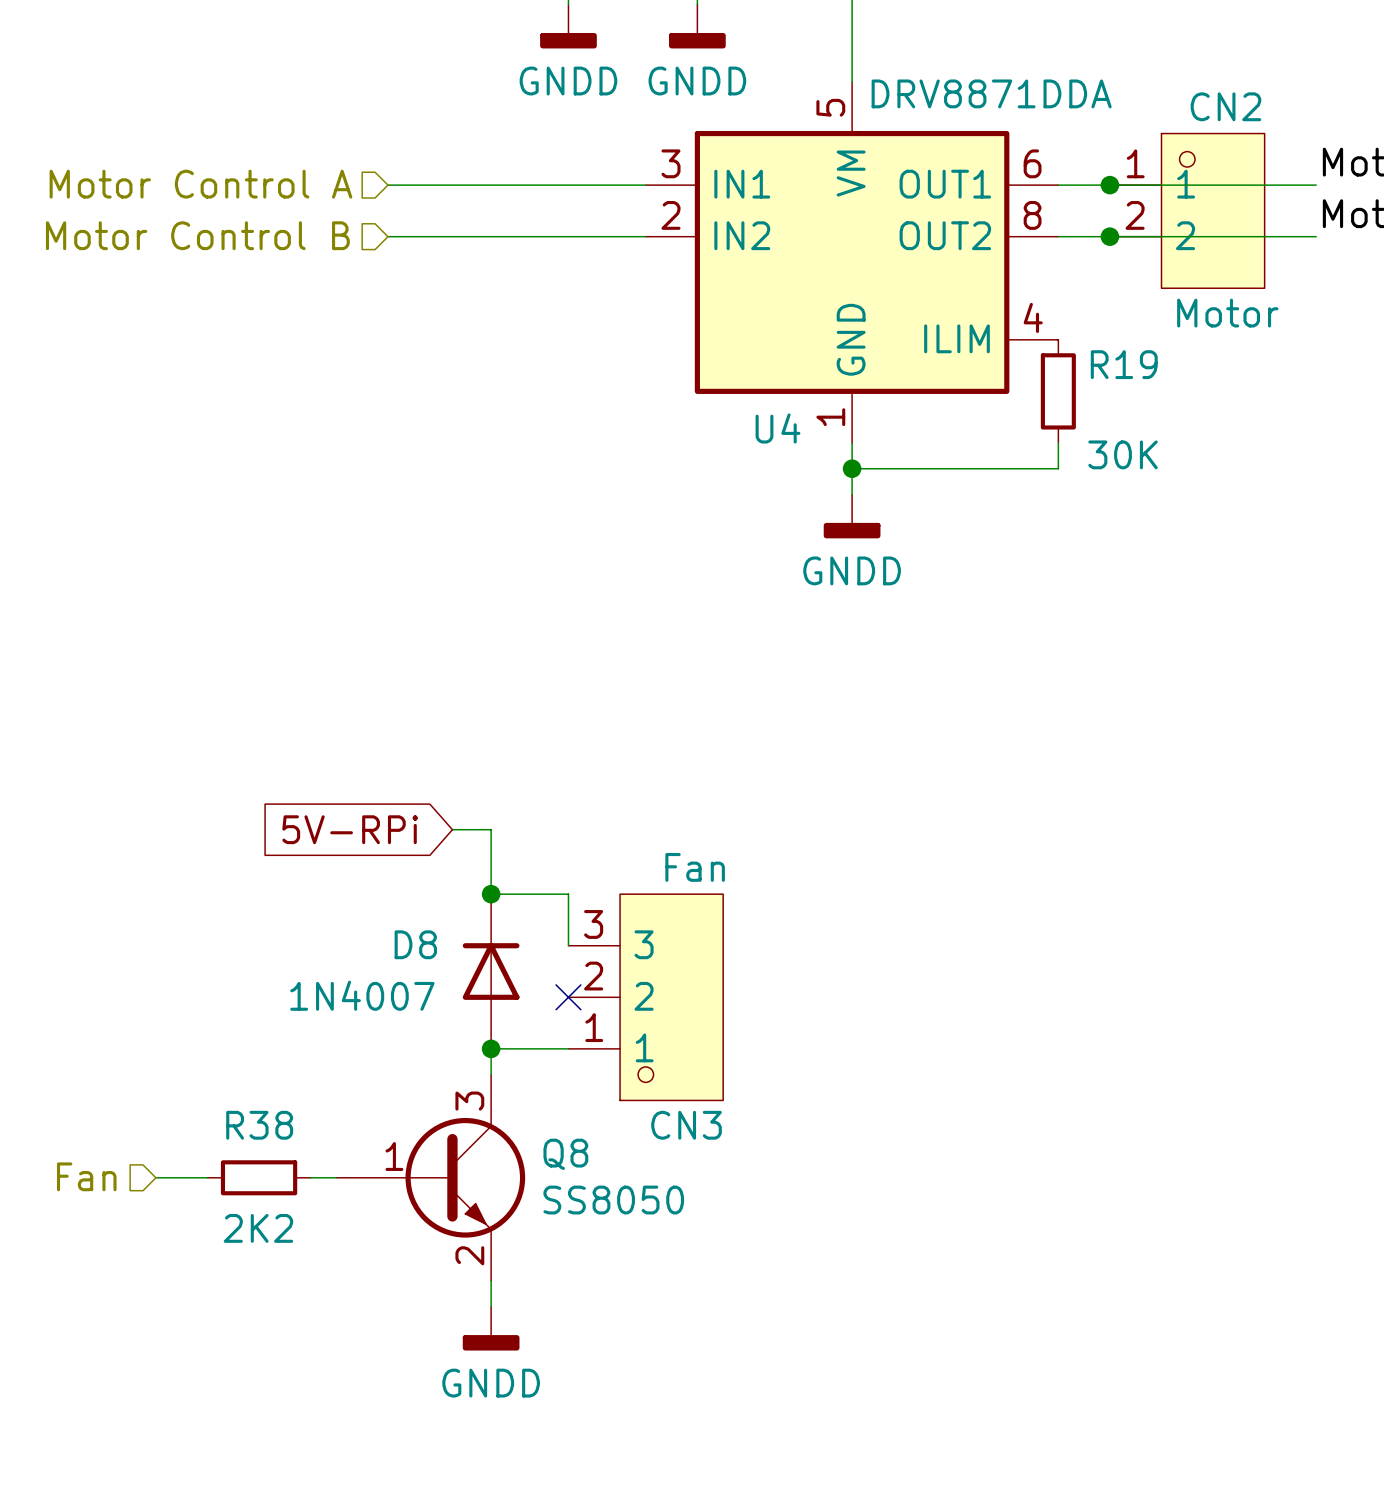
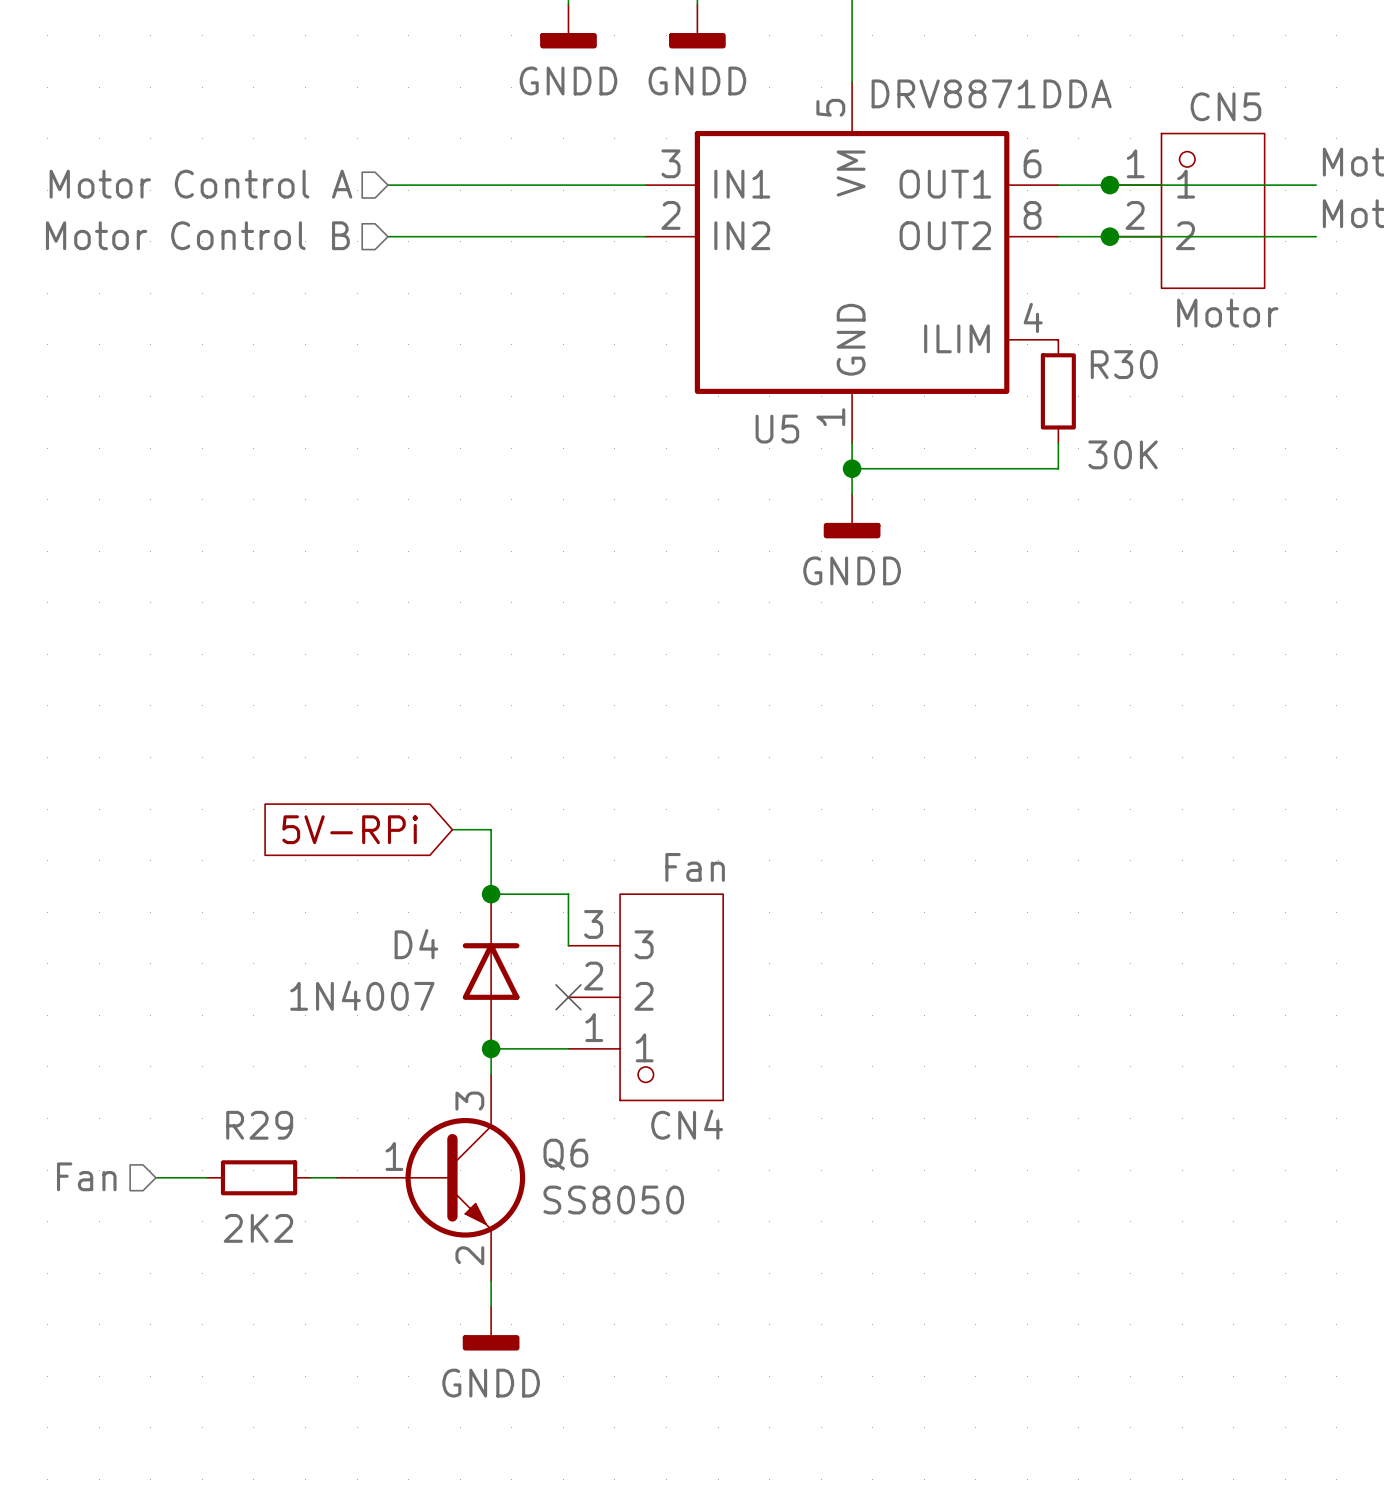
CN2 name: CN2 (1225, 106) -> CN5 (1225, 106)
R19 name: R19 (1124, 364) -> R30 (1124, 364)
U4 name: U4 (778, 428) -> U5 (777, 429)
D8 name: D8 (415, 944) -> D4 (416, 944)
R38 name: R38 (259, 1125) -> R29 (259, 1125)
CN3 name: CN3 (686, 1125) -> CN4 (687, 1124)
Q8 name: Q8 (565, 1154) -> Q6 (565, 1154)

